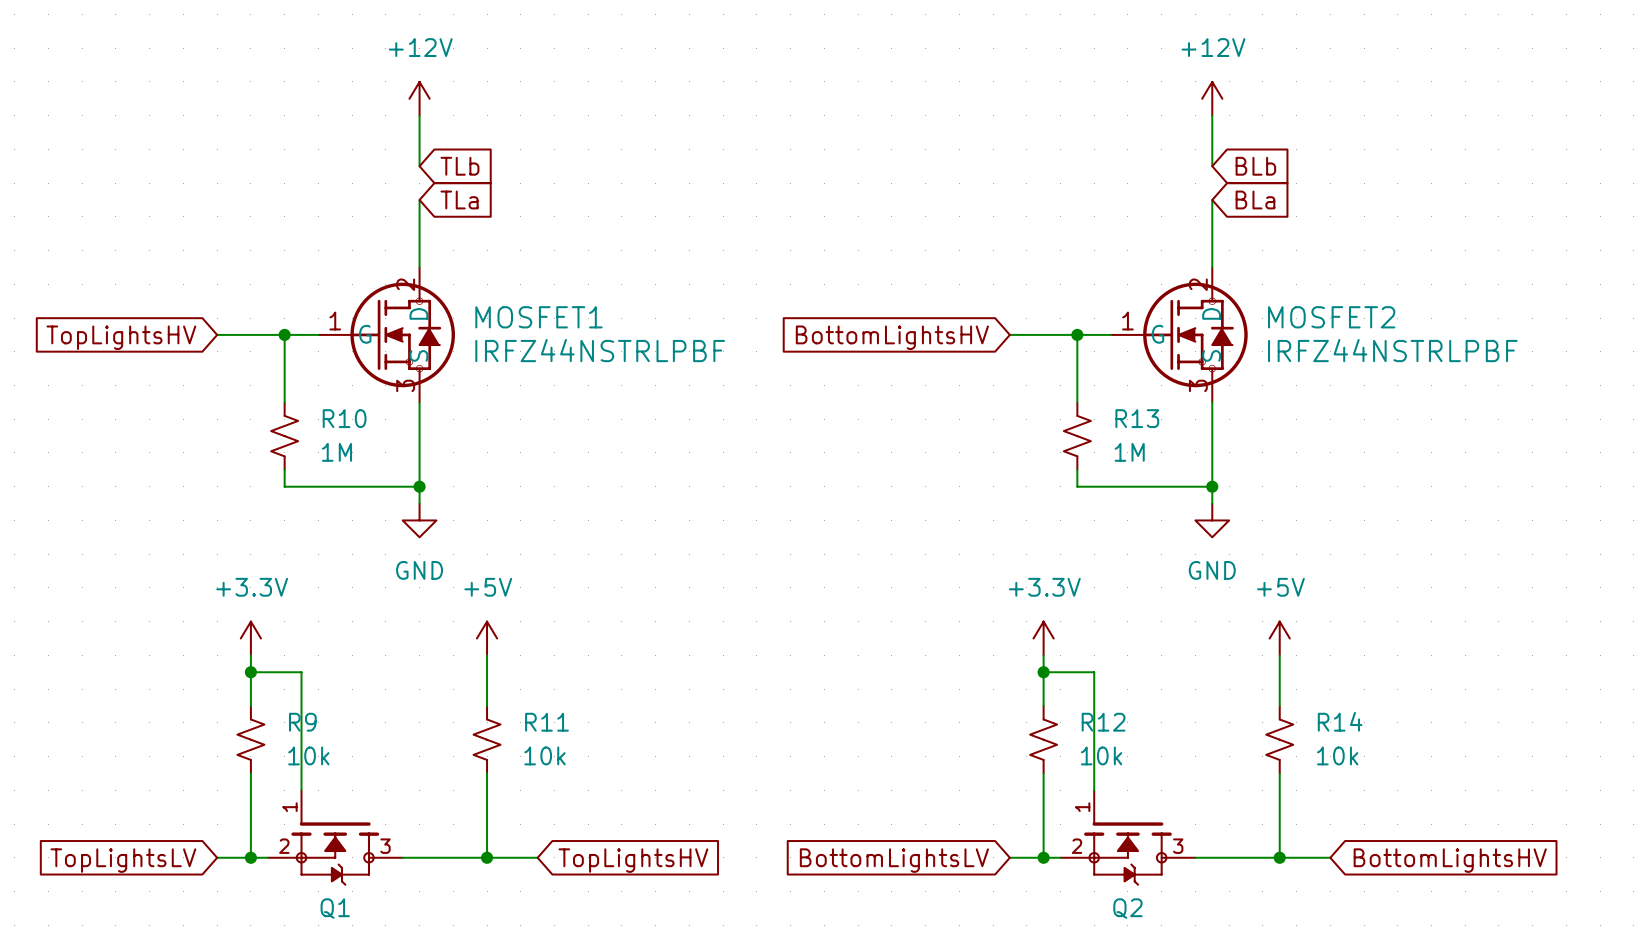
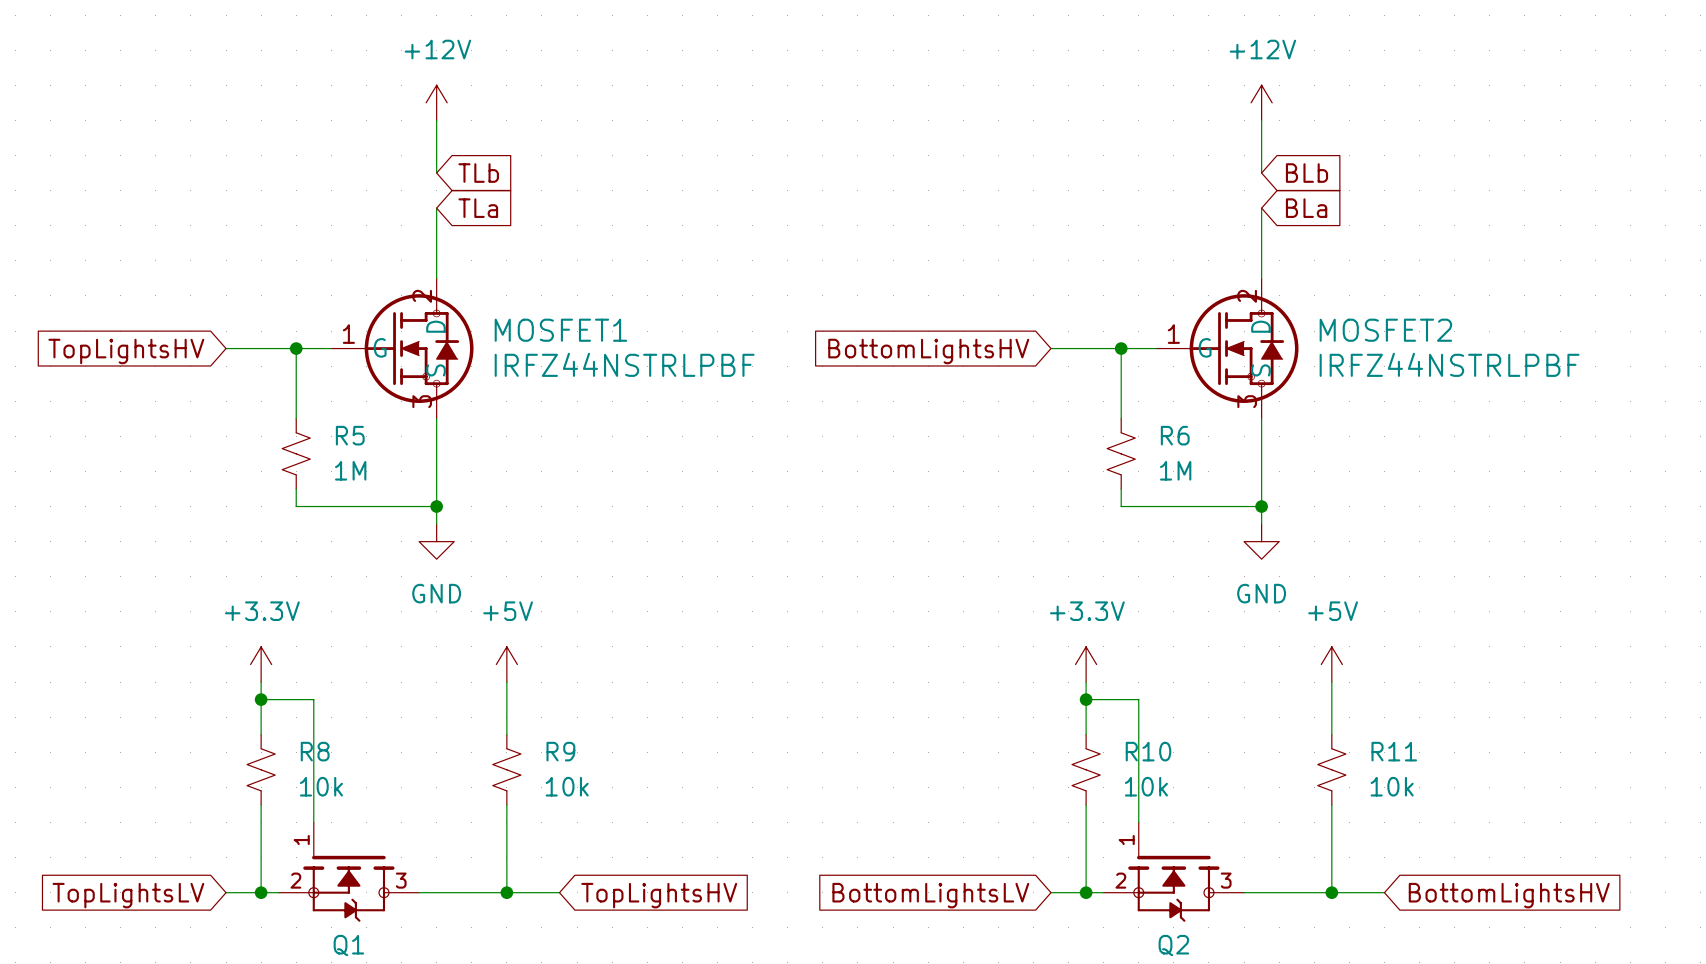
R10 name: R10 (344, 418) -> R5 (350, 435)
R13 name: R13 (1137, 418) -> R6 (1175, 435)
R14 name: R14 (1340, 721) -> R11 (1394, 751)
R9 name: R9 (302, 722) -> R8 (315, 751)
R11 name: R11 (546, 722) -> R9 (560, 751)
R12 name: R12 (1103, 722) -> R10 (1148, 751)

